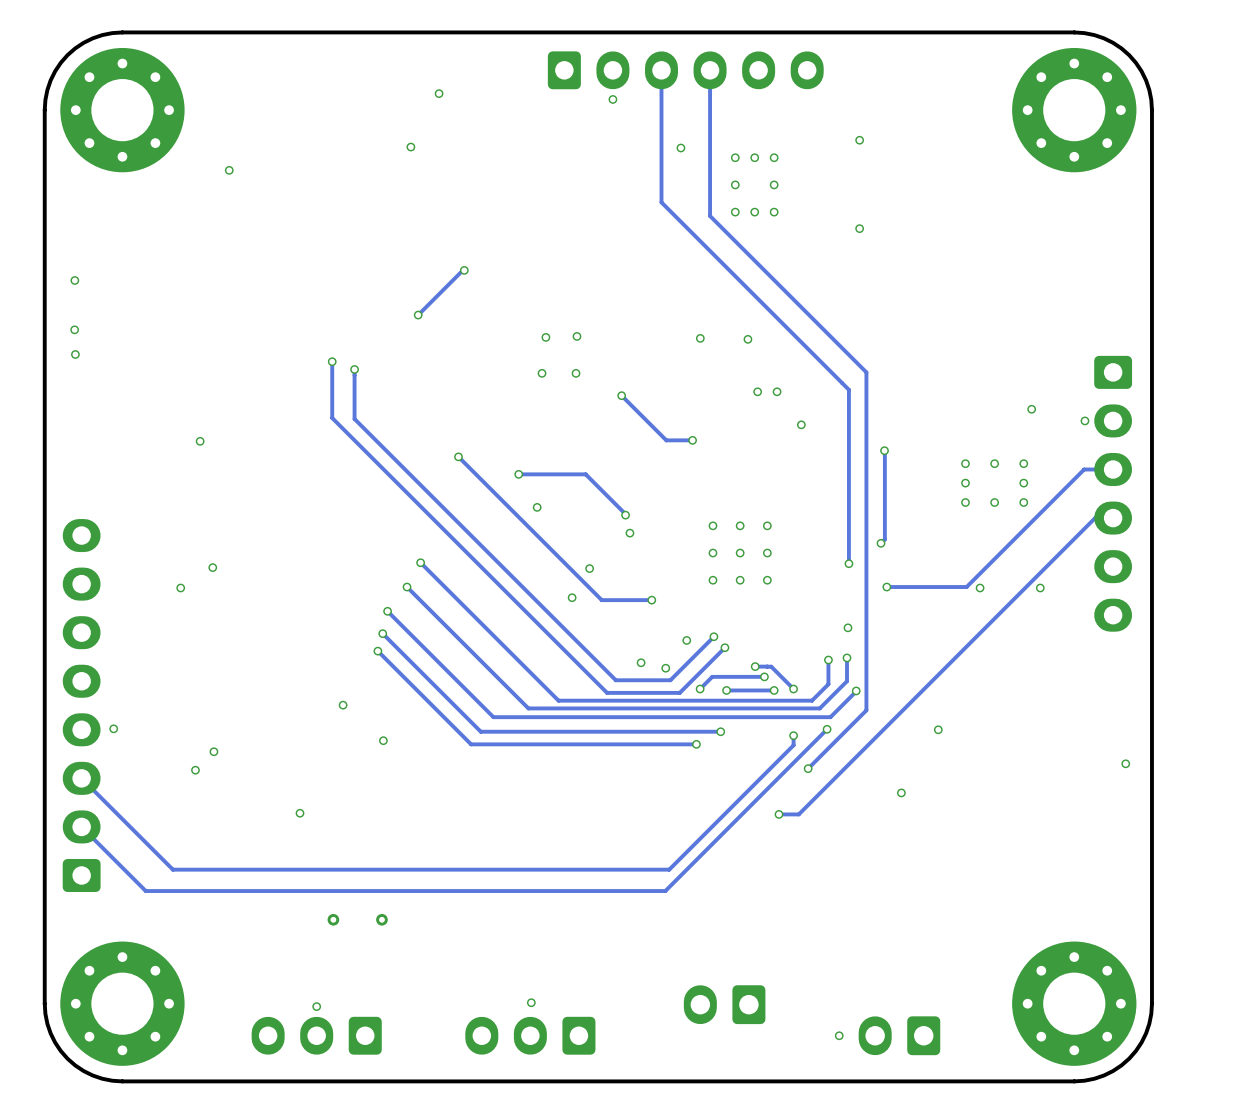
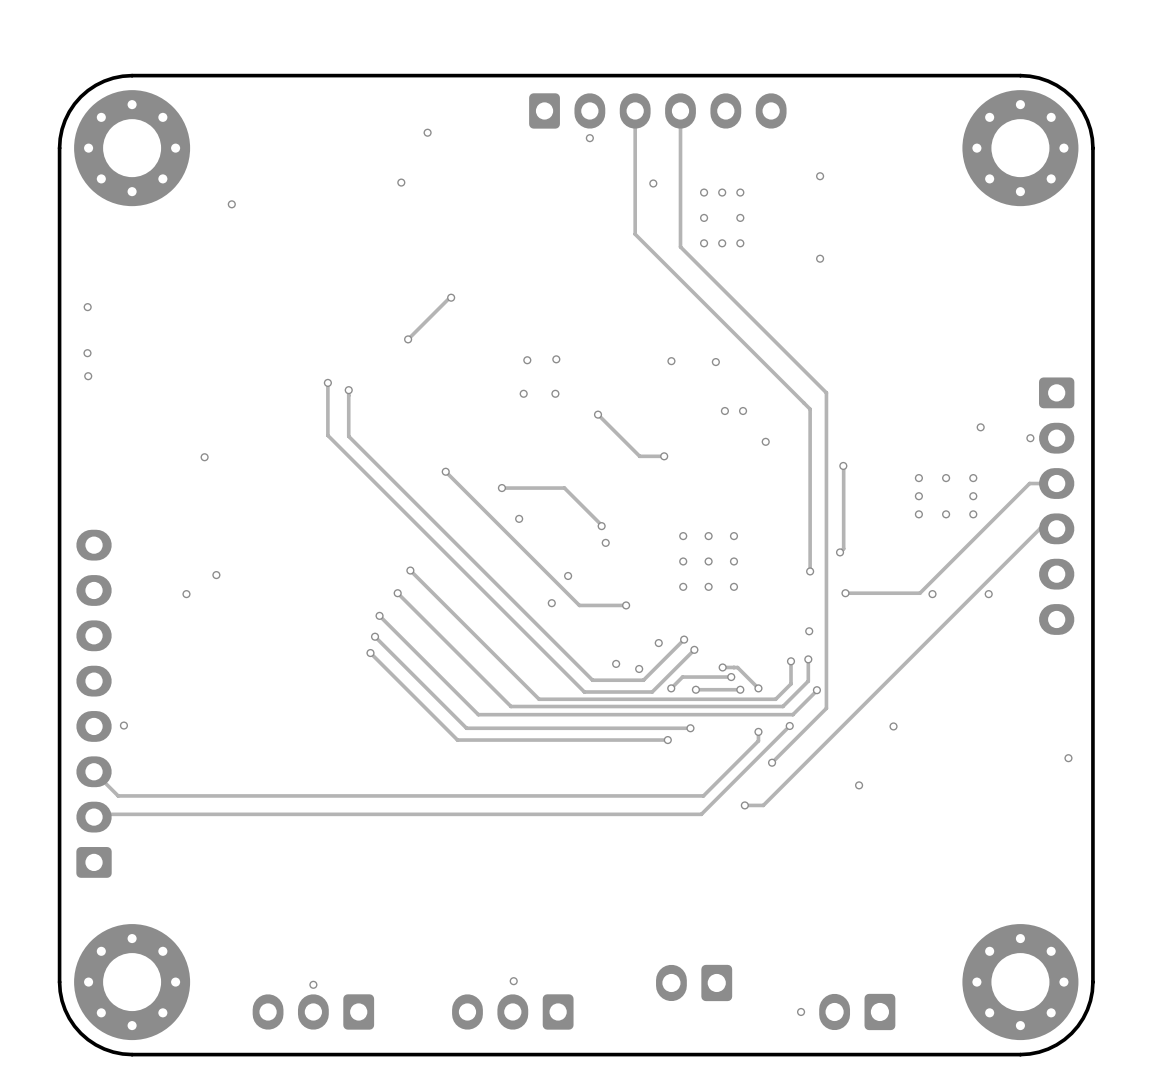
via: (343, 705) -> none
via: (383, 740) -> none
via: (213, 751) -> none
via: (195, 770) -> none
track: (734, 804) (669, 869) (172, 869) (107, 804) -> (703, 795) (118, 795)
via: (300, 813) -> none
track: (732, 823) (665, 891) (145, 891) (81, 826) -> (701, 814) (96, 814) (94, 817)
via: (333, 919) -> none
via: (381, 919) -> none

